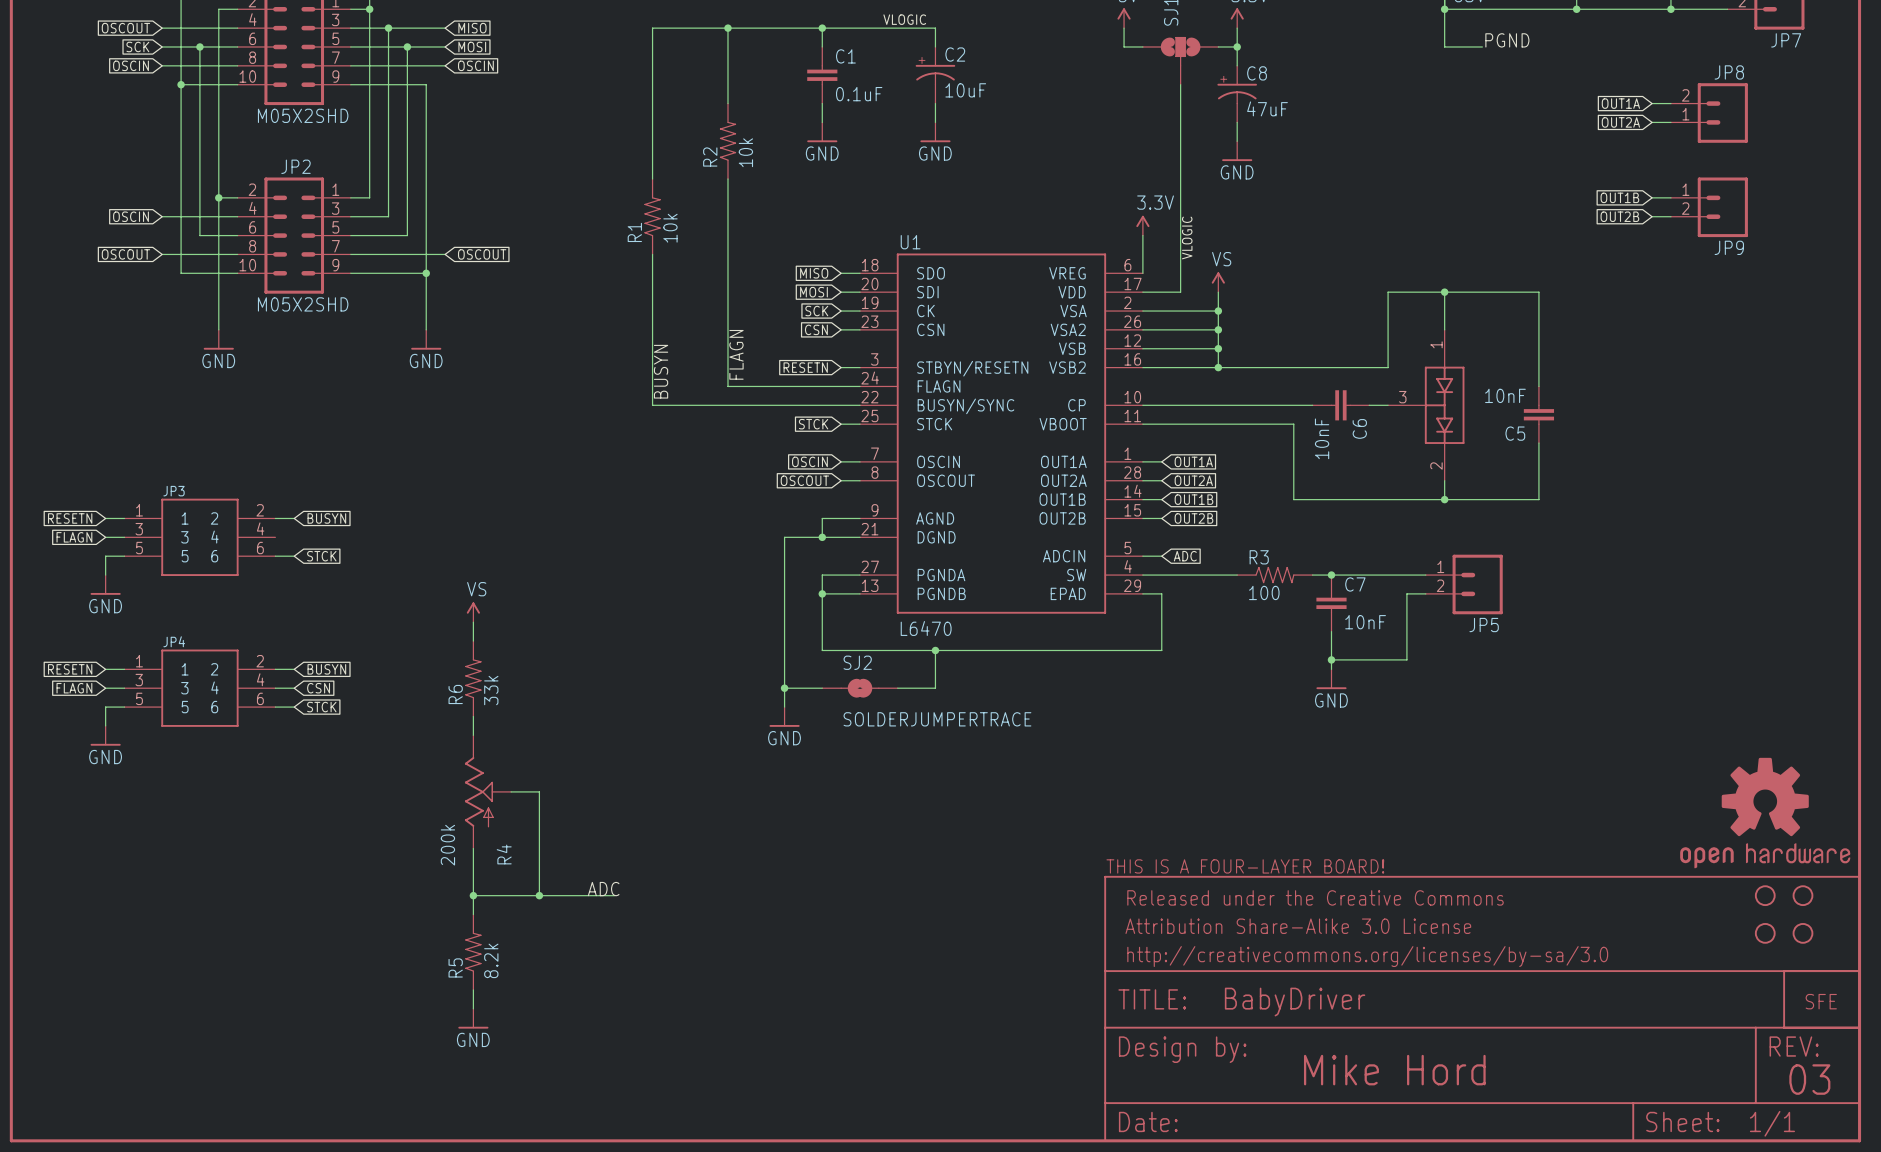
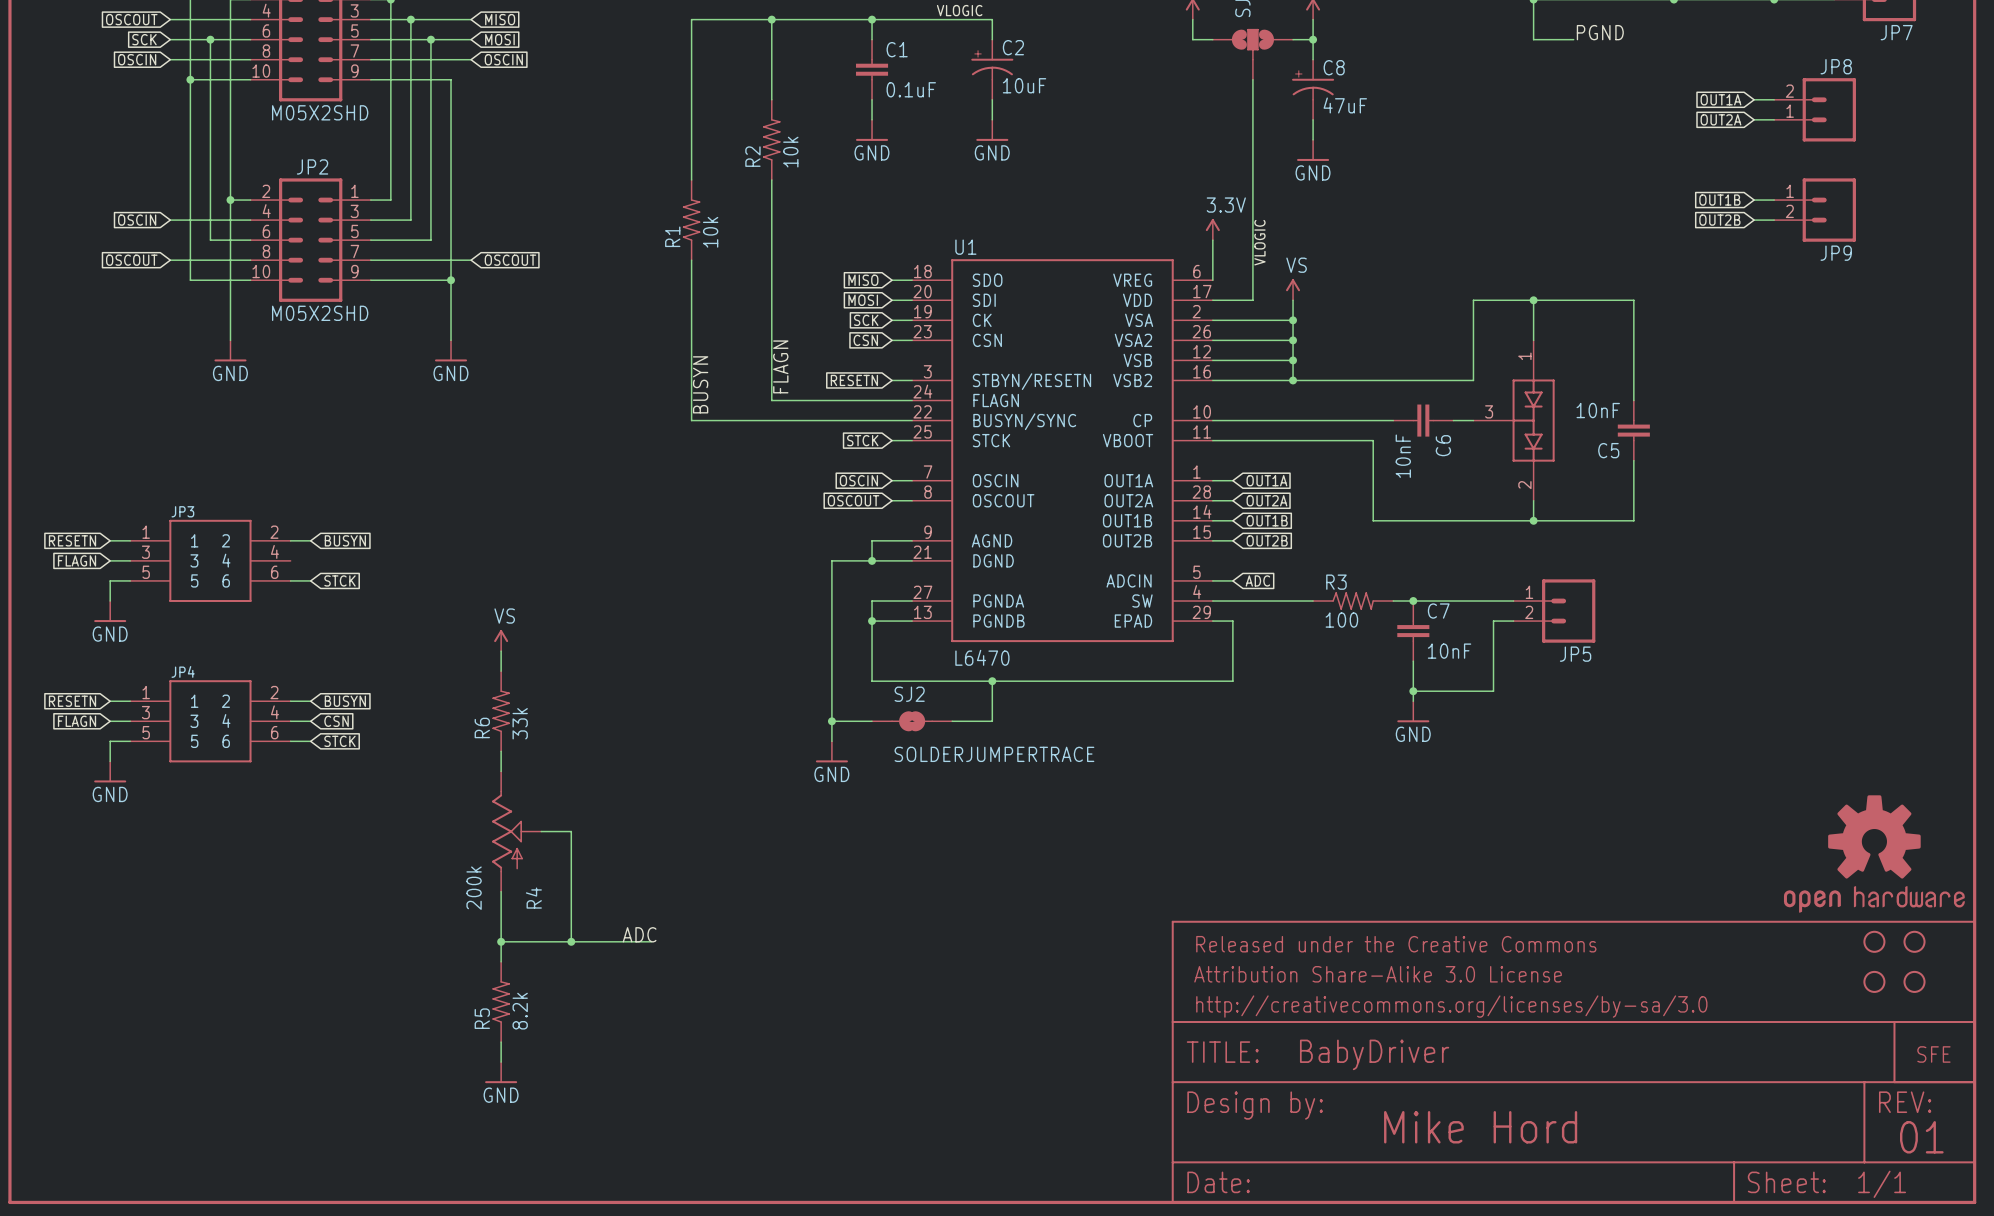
part: (1245, 866) -> none
text: 03 (1809, 1079) -> 01 (1921, 1137)

